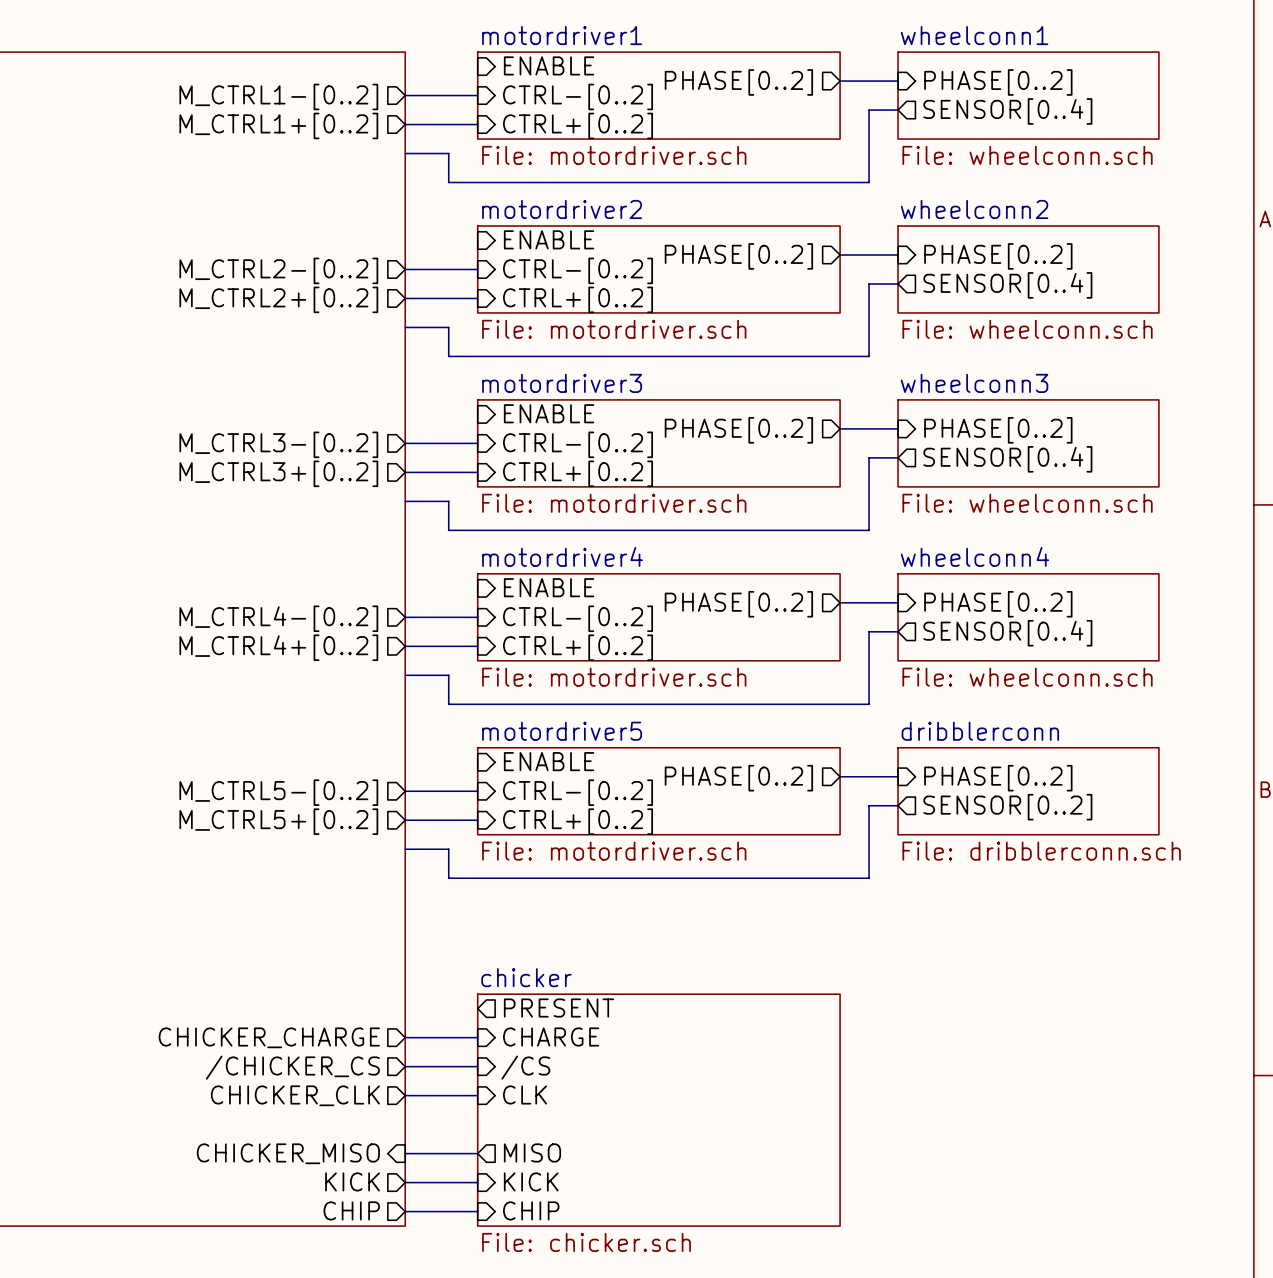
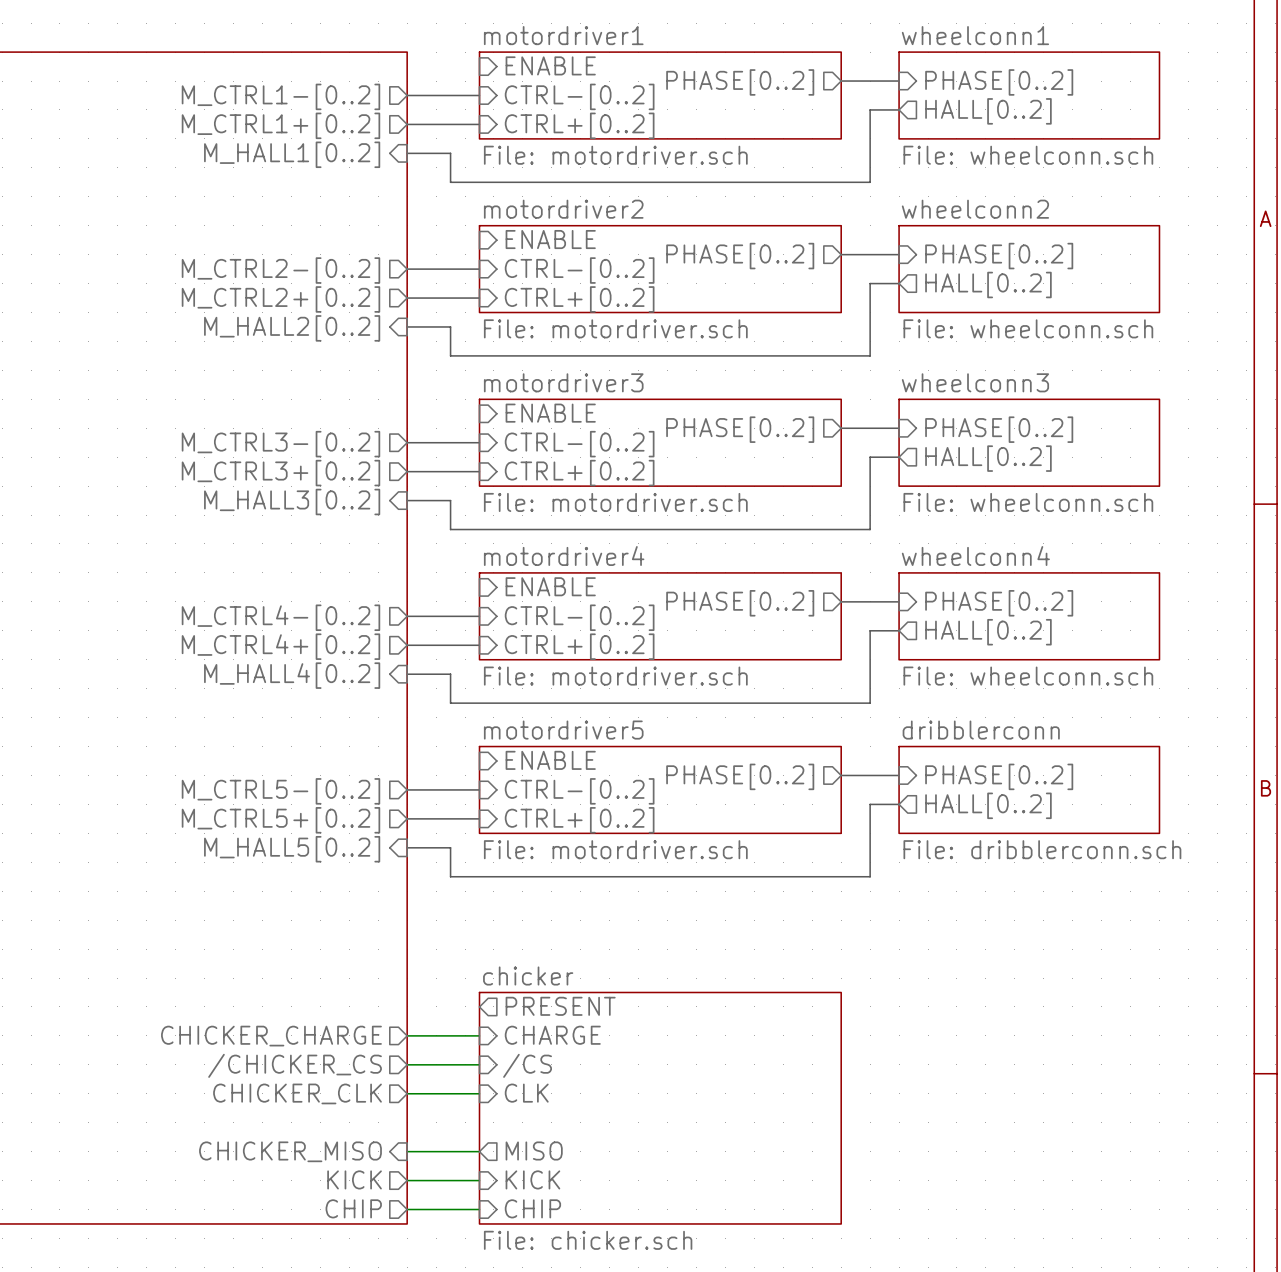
sheet pin: SENSOR[0..4] (1007, 111) -> HALL[0..2] (988, 111)
sheet pin: none -> M_HALL1[0..2] (292, 154)
sheet pin: SENSOR[0..4] (1007, 285) -> HALL[0..2] (988, 284)
sheet pin: none -> M_HALL2[0..2] (292, 328)
sheet pin: SENSOR[0..4] (1007, 459) -> HALL[0..2] (988, 458)
sheet pin: none -> M_HALL3[0..2] (292, 502)
sheet pin: SENSOR[0..4] (1007, 633) -> HALL[0..2] (988, 632)
sheet pin: none -> M_HALL4[0..2] (292, 675)
sheet pin: SENSOR[0..2] (1007, 807) -> HALL[0..2] (988, 805)
sheet pin: none -> M_HALL5[0..2] (292, 849)

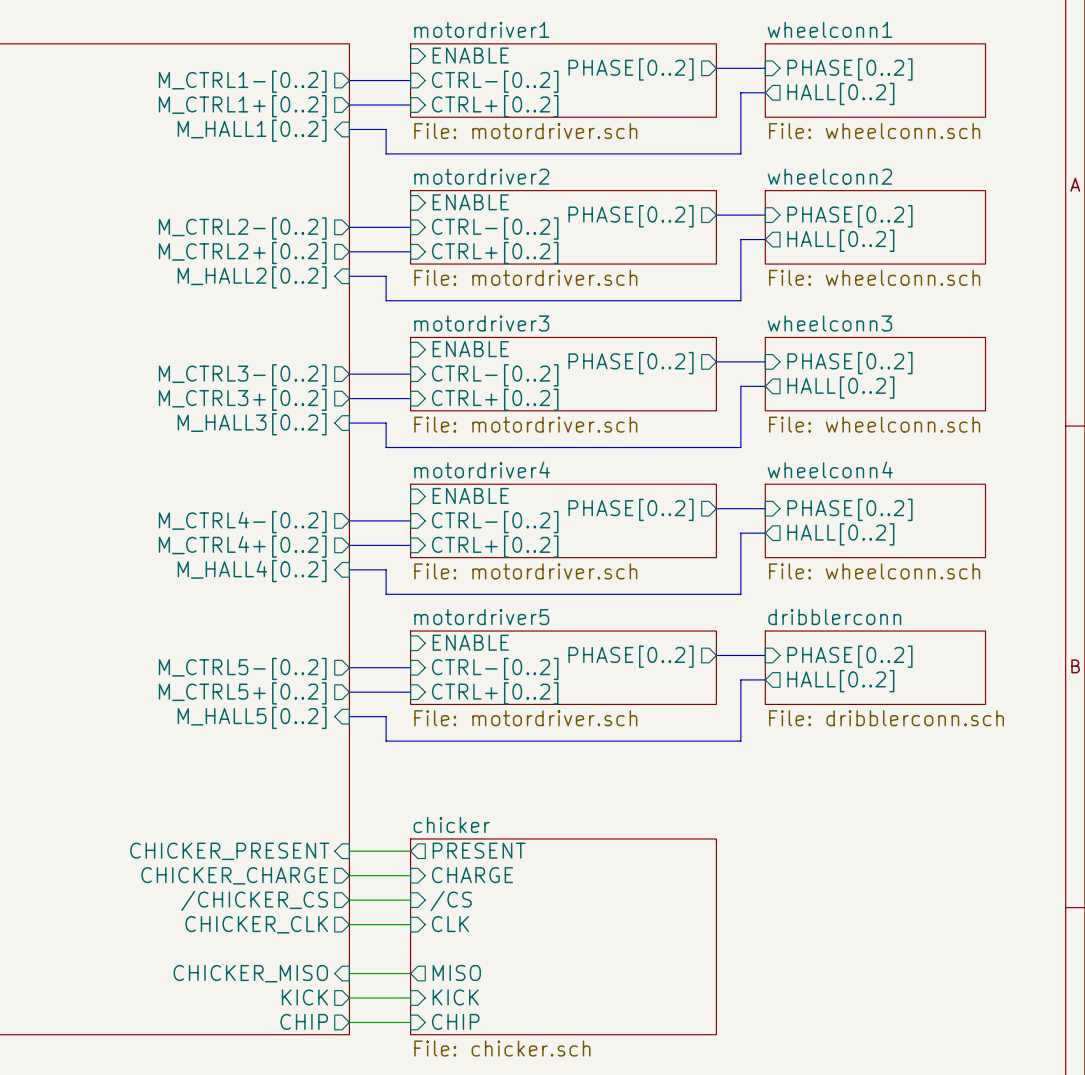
wire: none -> (349, 851) (410, 851)
sheet pin: none -> CHICKER_PRESENT (229, 851)

